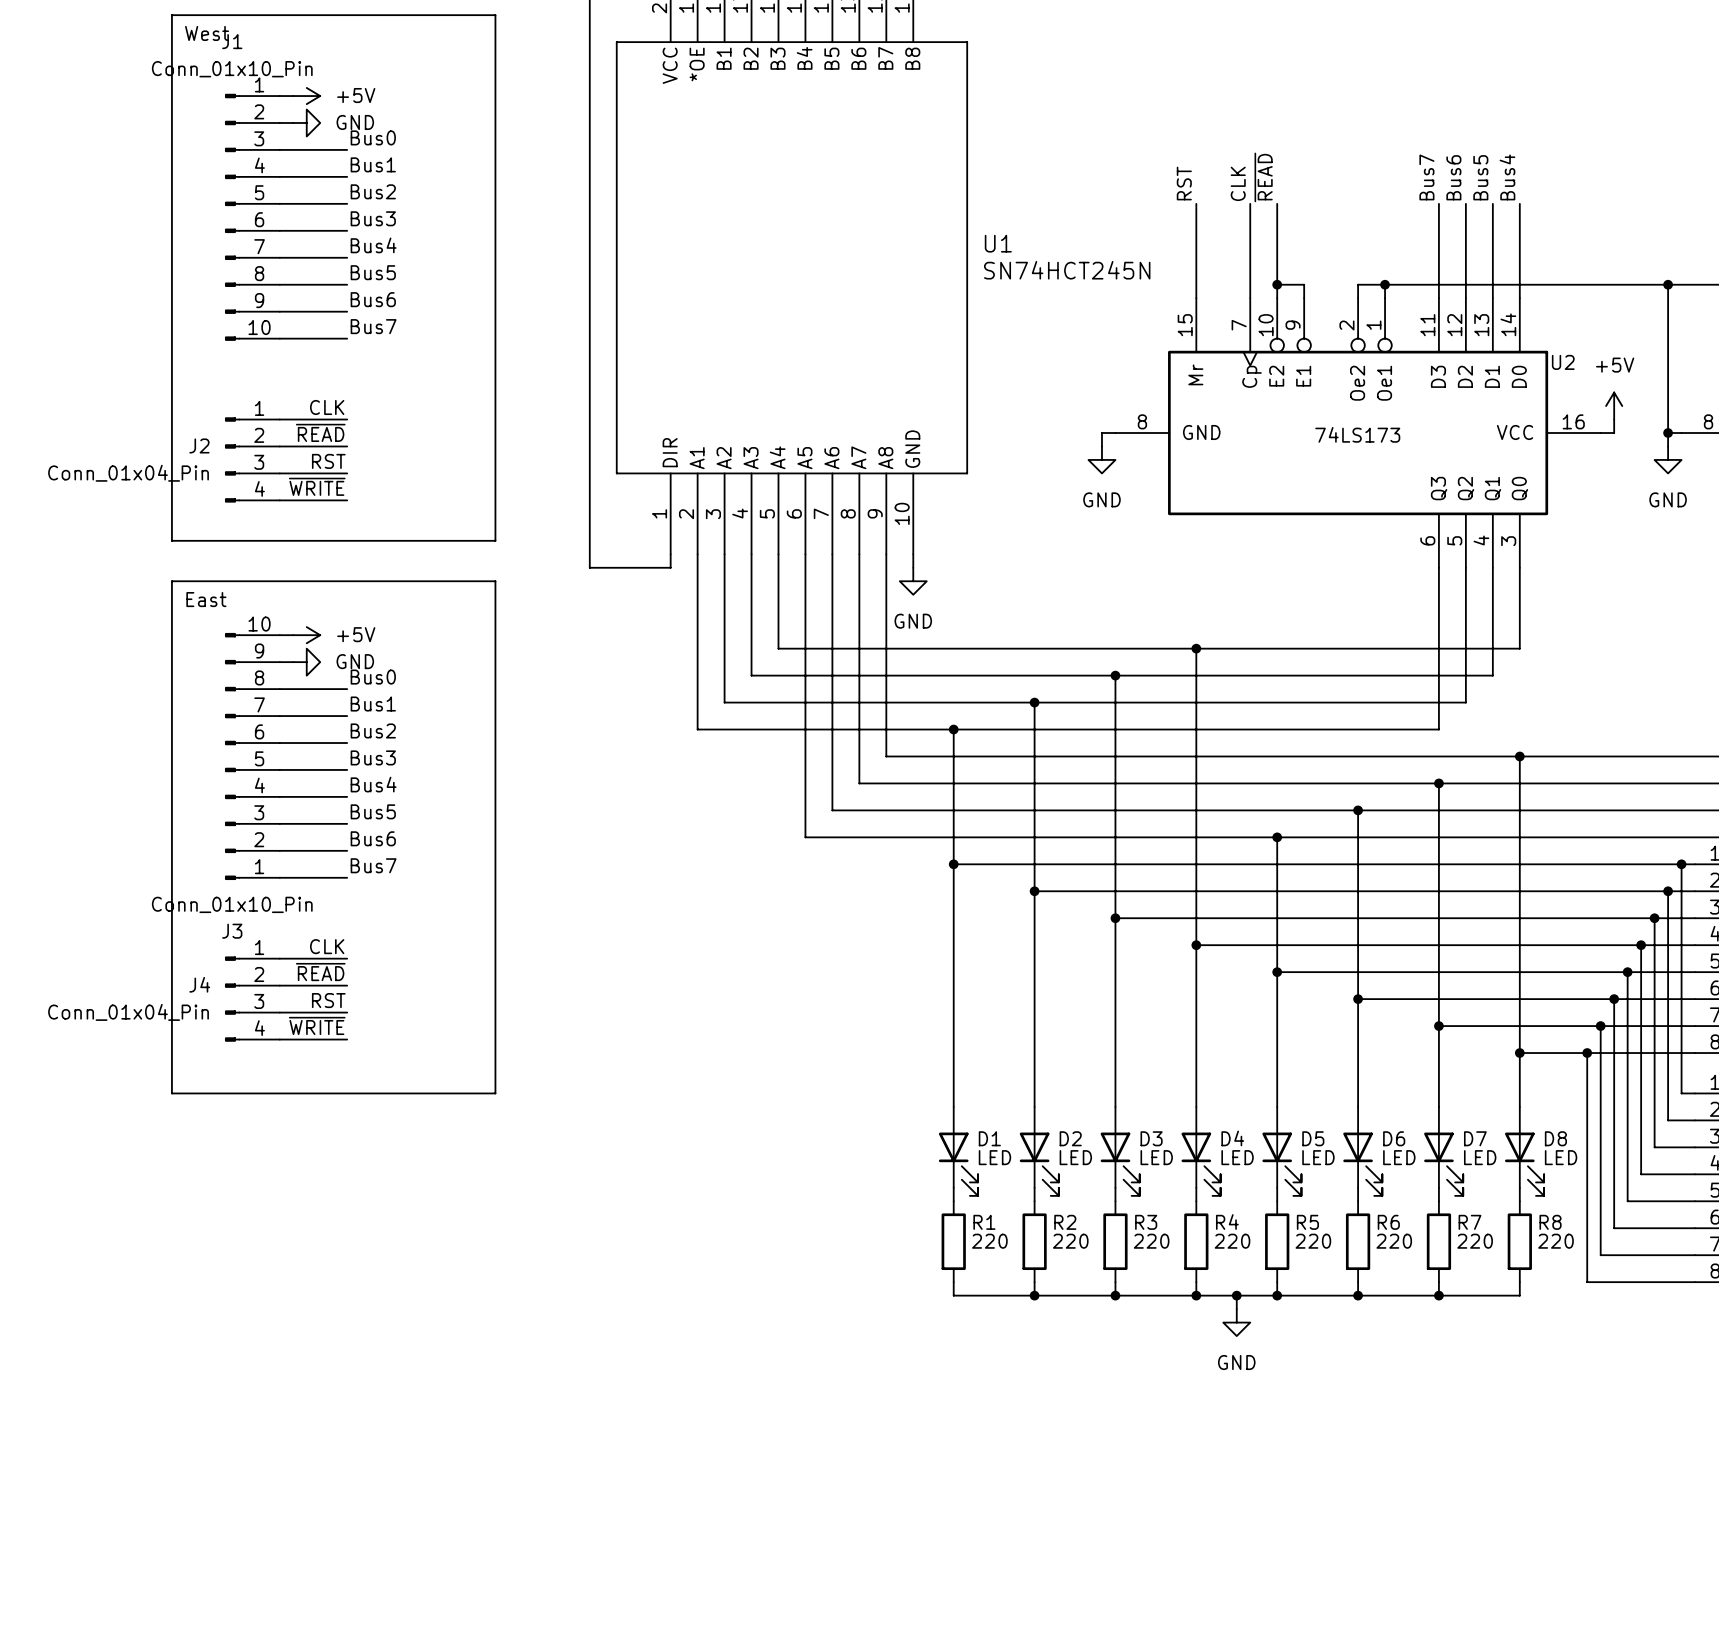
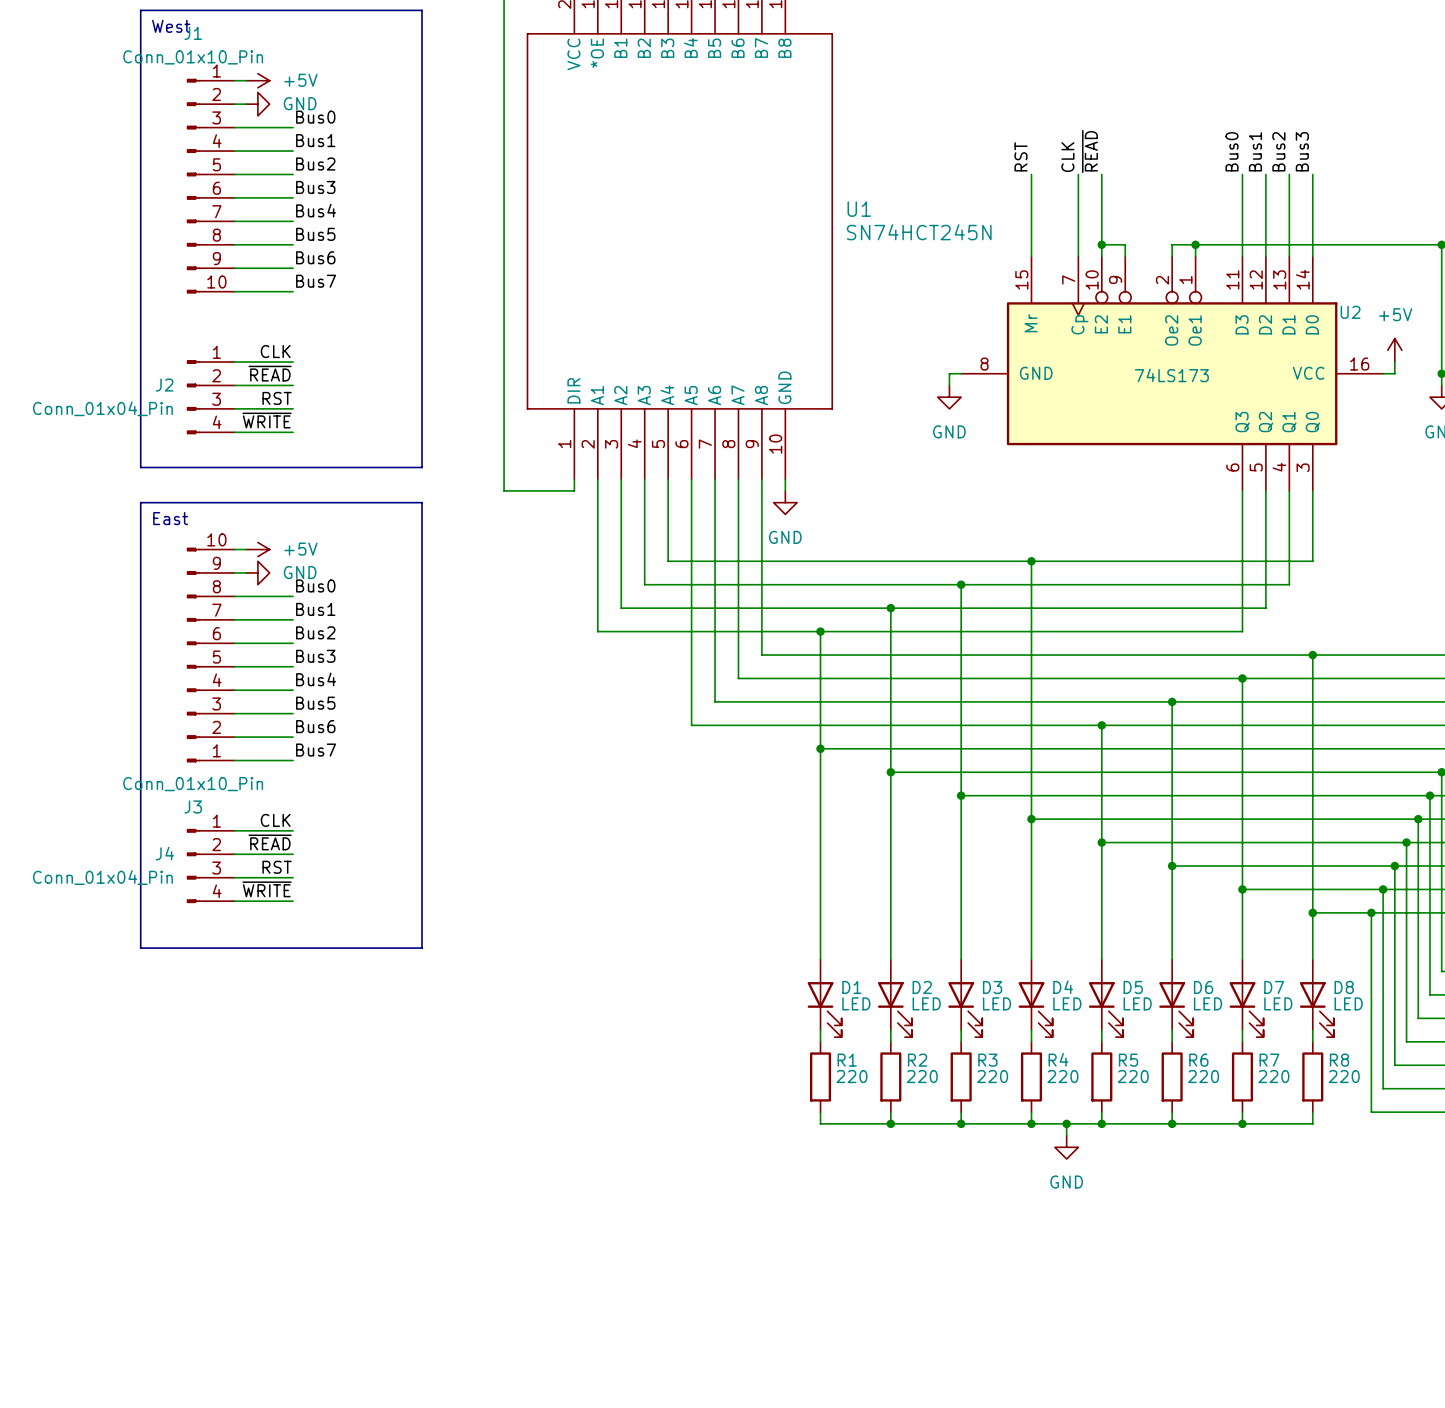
label: Bus7 (1426, 177) -> Bus0 (1232, 151)
label: Bus6 (1453, 177) -> Bus1 (1255, 151)
label: Bus5 (1480, 177) -> Bus2 (1278, 151)
label: Bus4 (1507, 177) -> Bus3 (1302, 151)

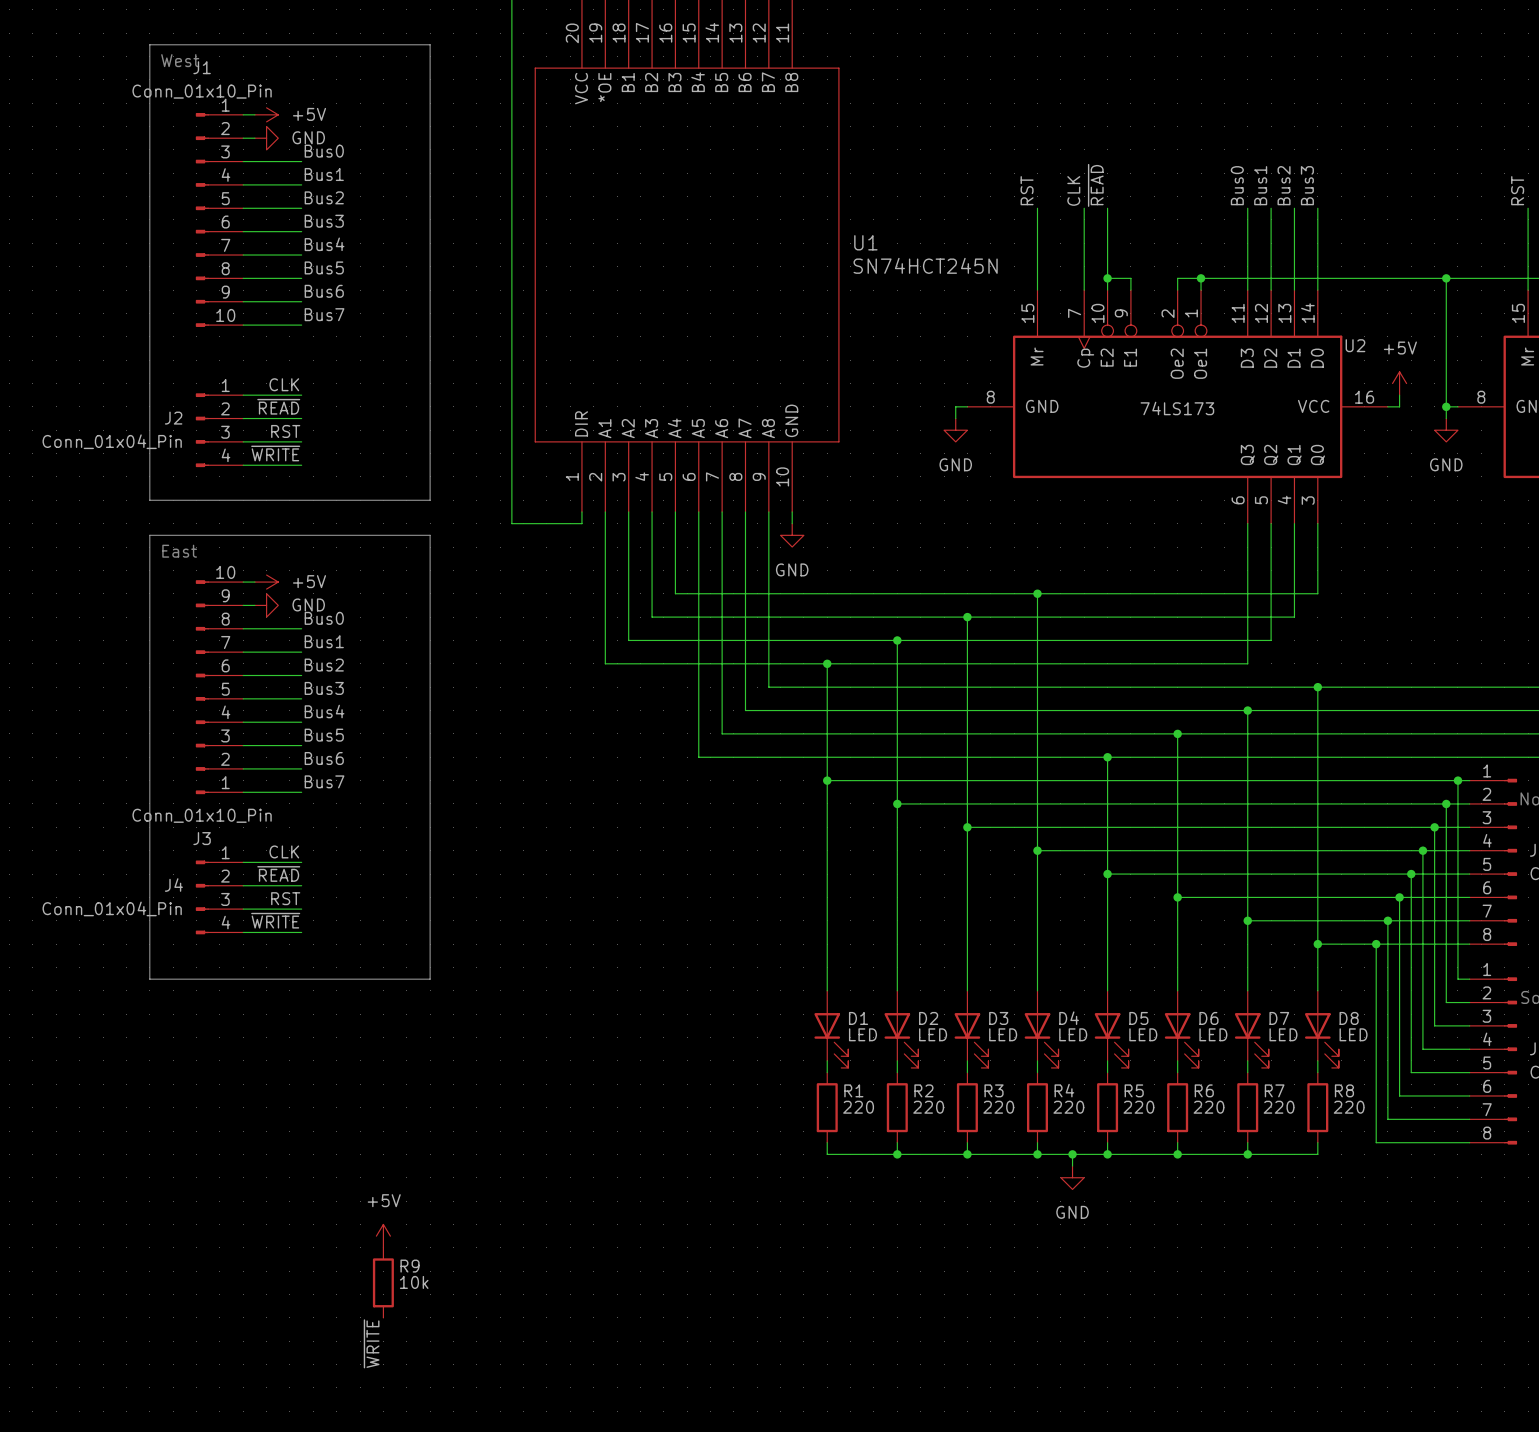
power symbol: none -> +5V (383, 1236)
R9: none -> 10k (383, 1282)
label: none -> ~{WRITE} (371, 1343)

